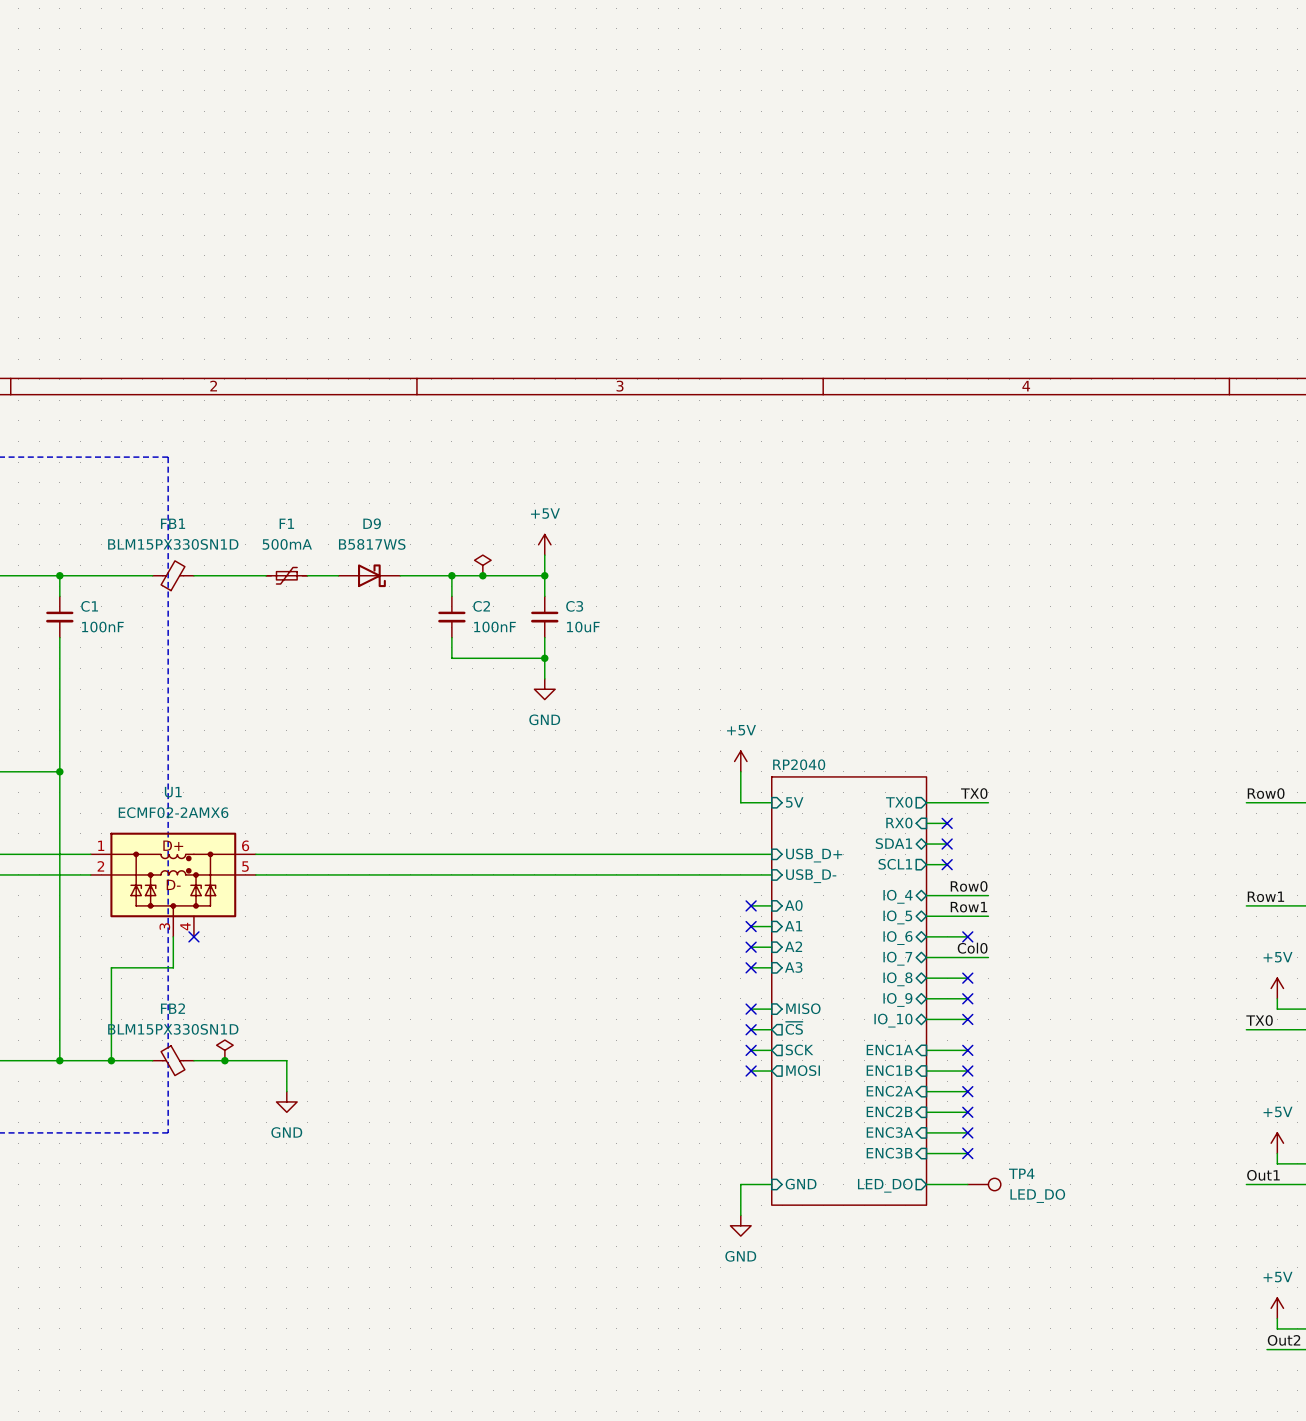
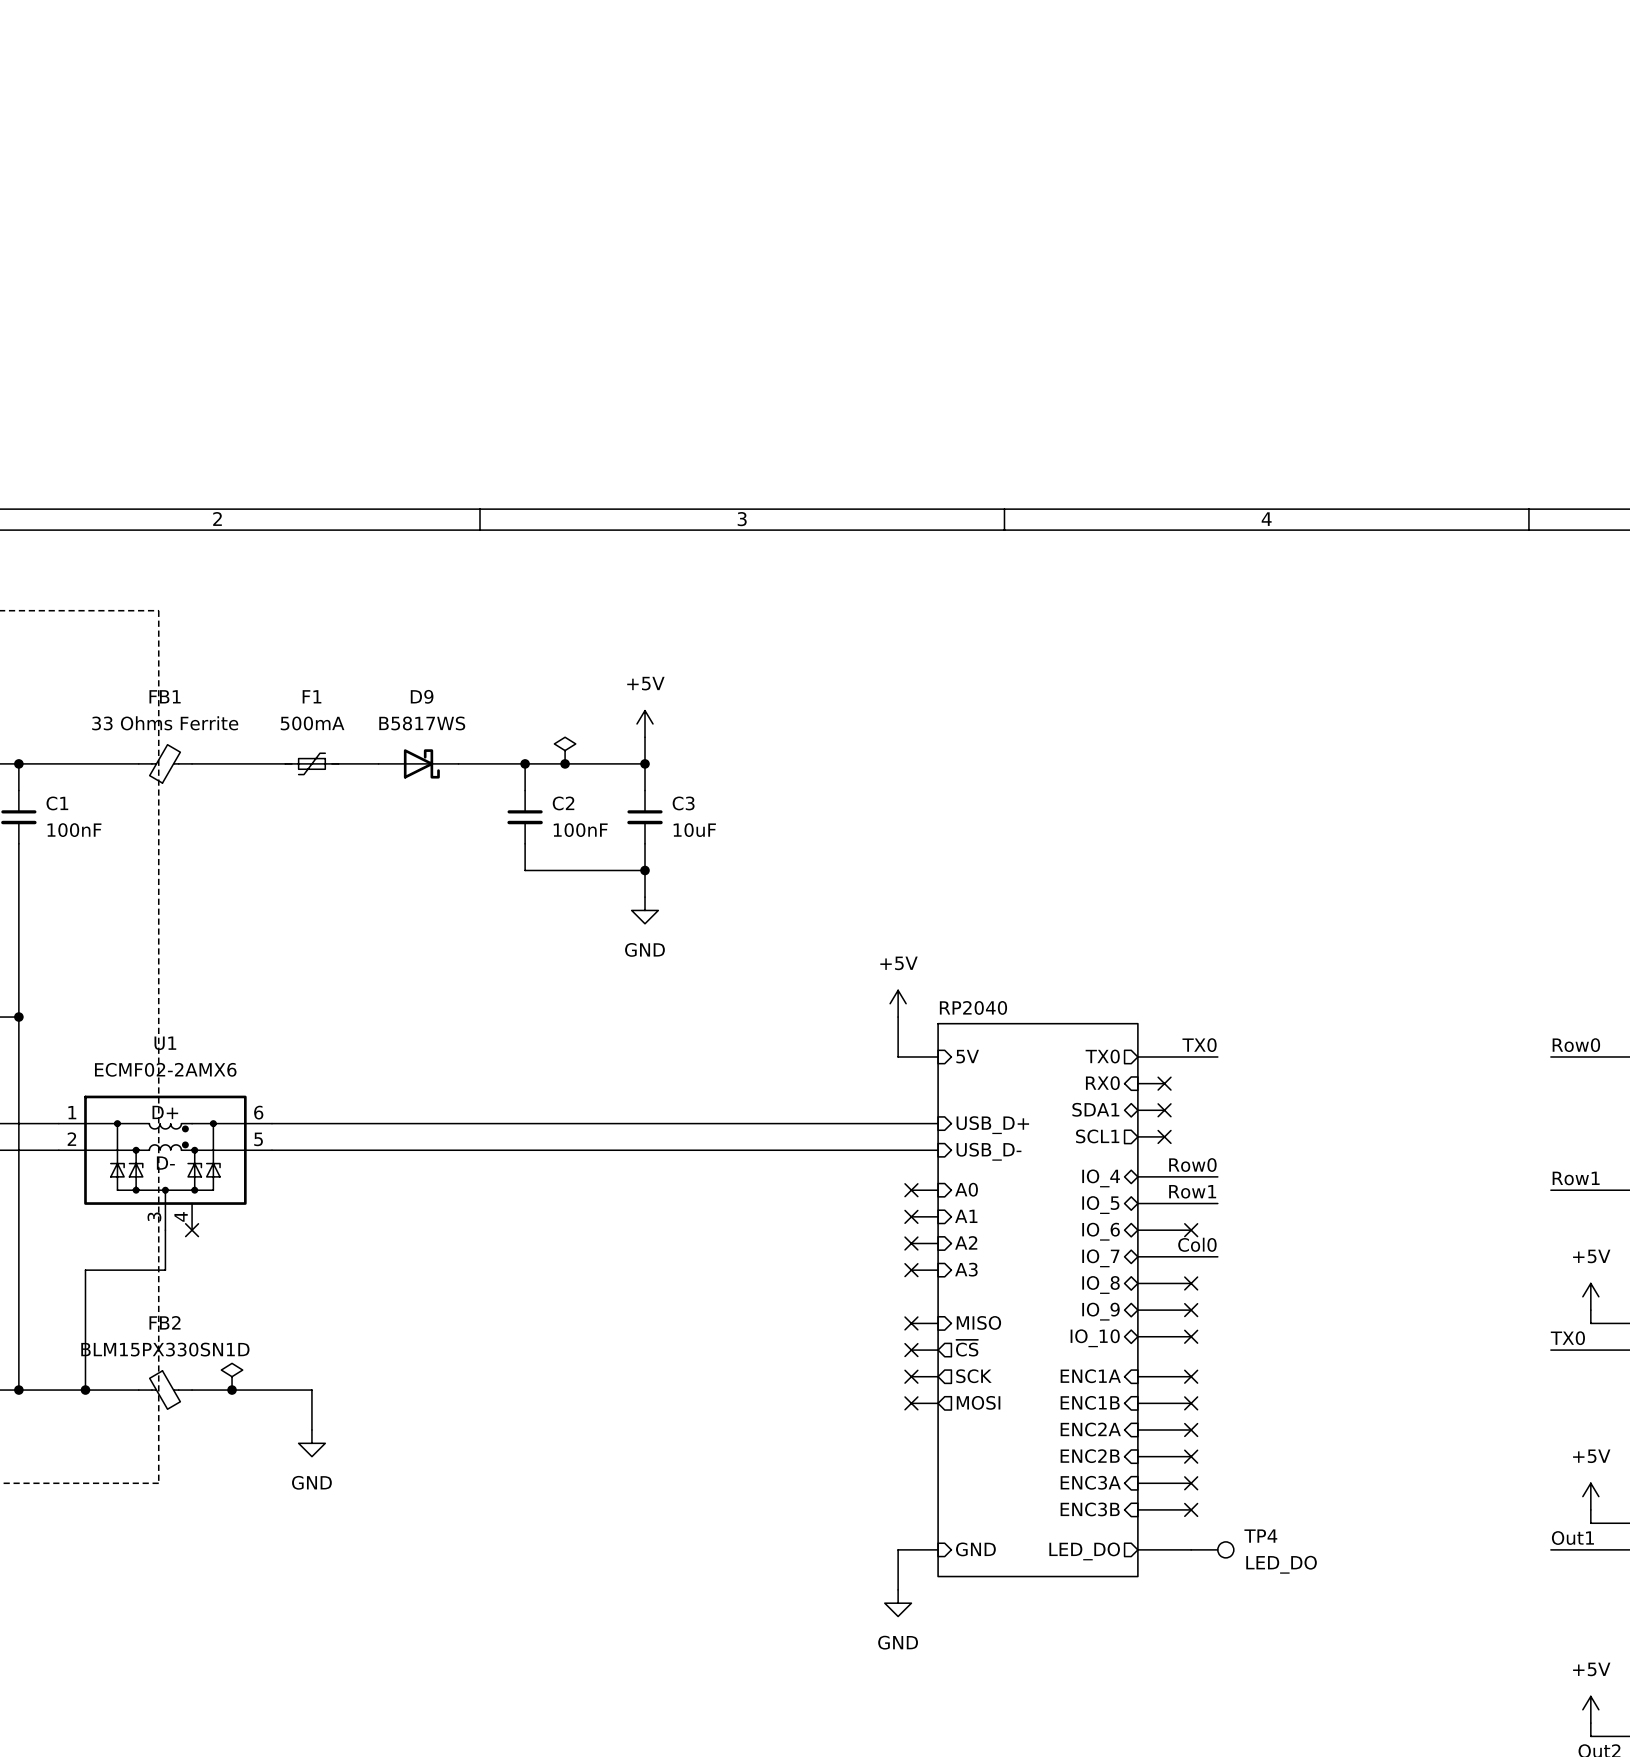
FB1 value: BLM15PX330SN1D (173, 544) -> 33 Ohms Ferrite (165, 723)

